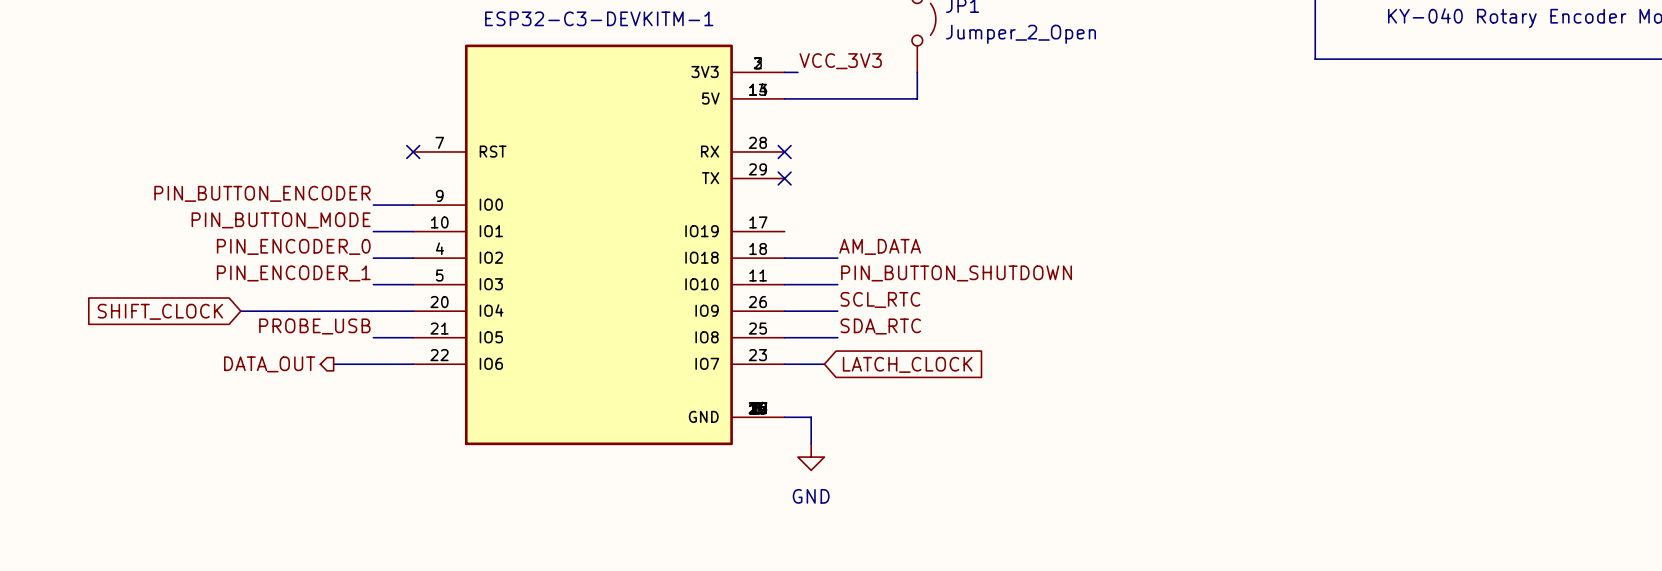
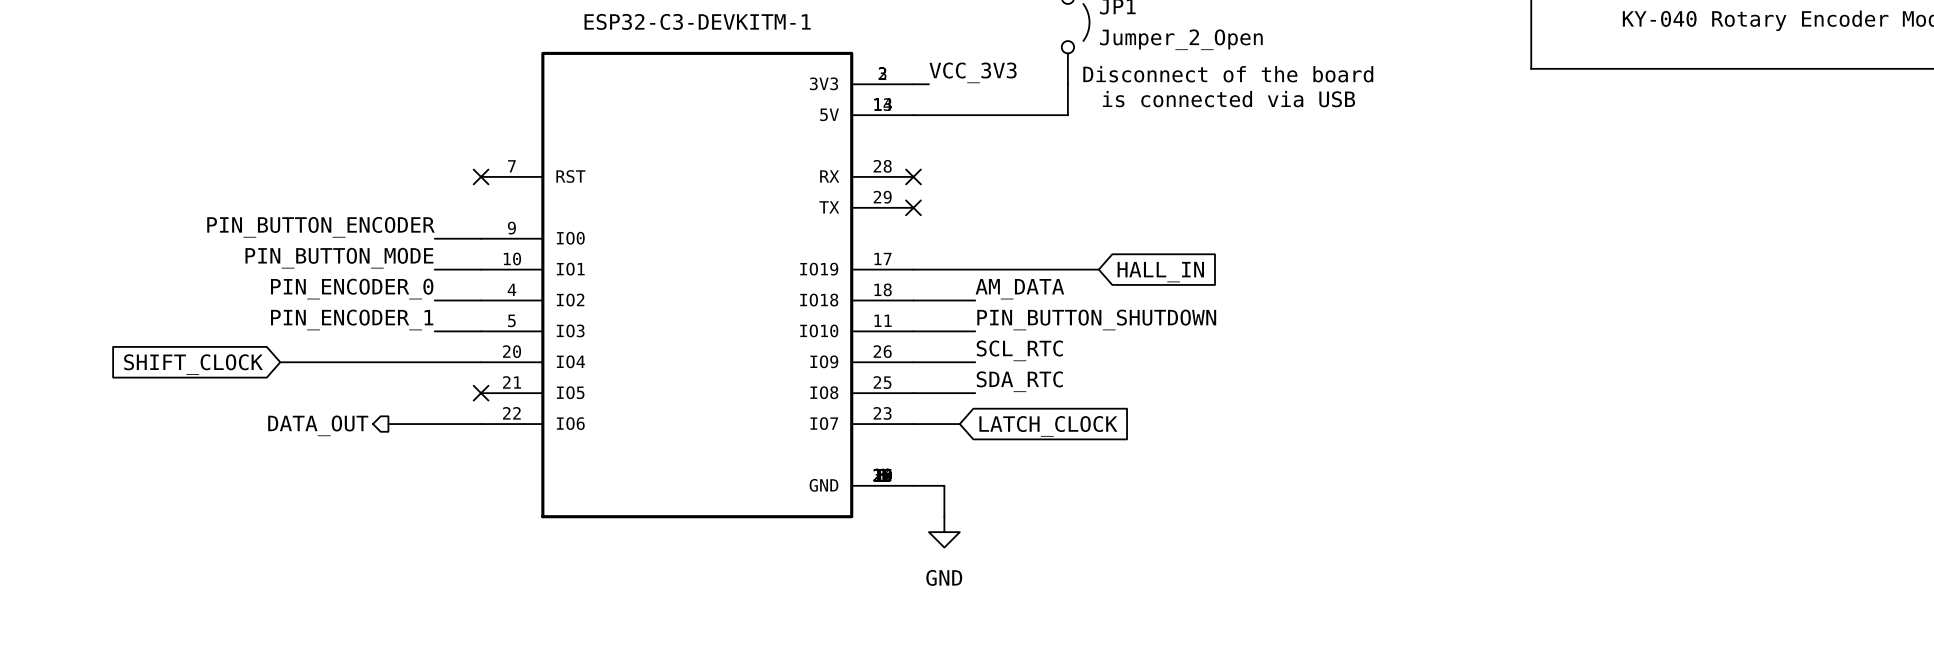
text: none -> Disconnect of the board (1228, 74)
text: none -> is connected via USB (1228, 99)
wire: none -> (913, 269) (1098, 269)
global label: none -> HALL_IN (1160, 272)
label: PROBE_USB (314, 326) -> none
wire: (373, 337) (413, 337) -> none
no-connect mark: none -> (481, 393)

